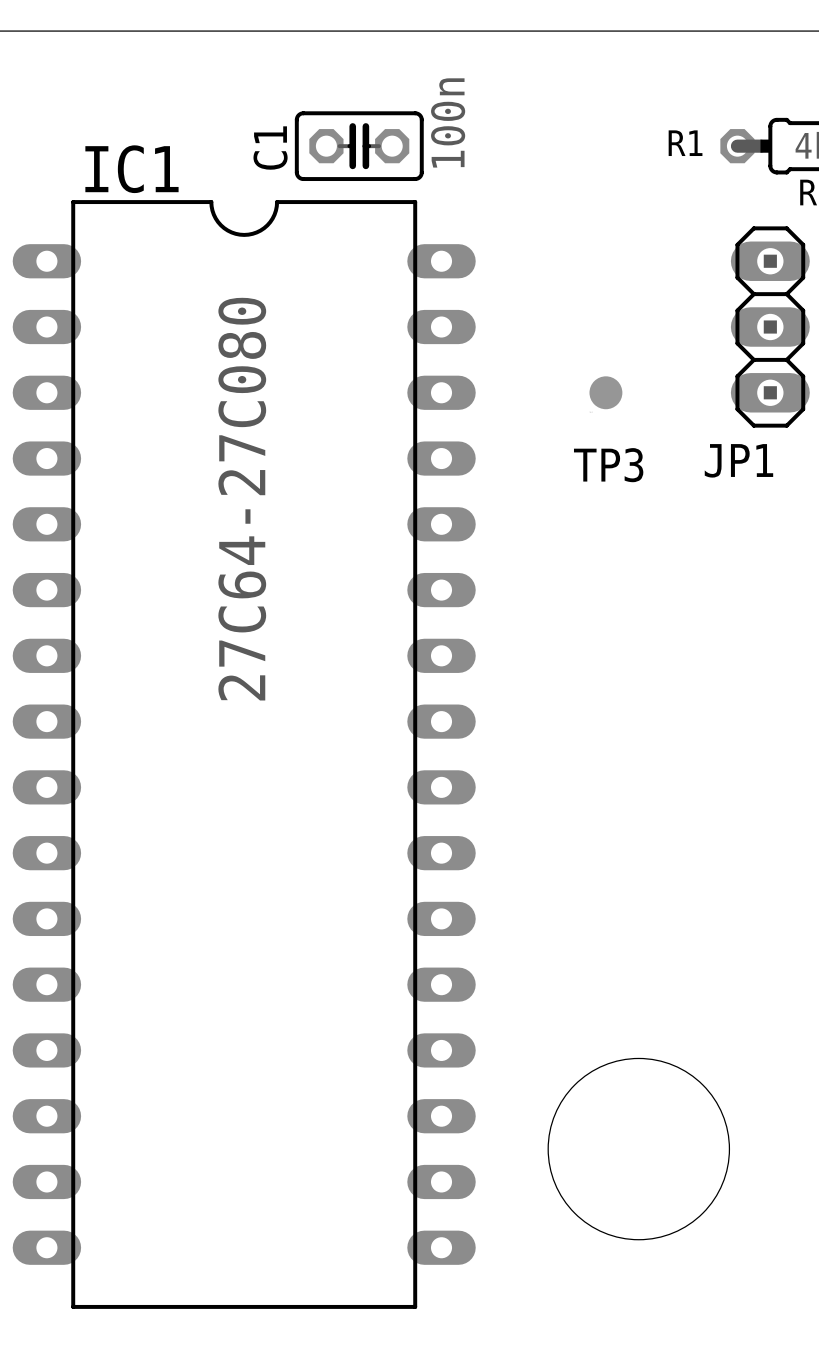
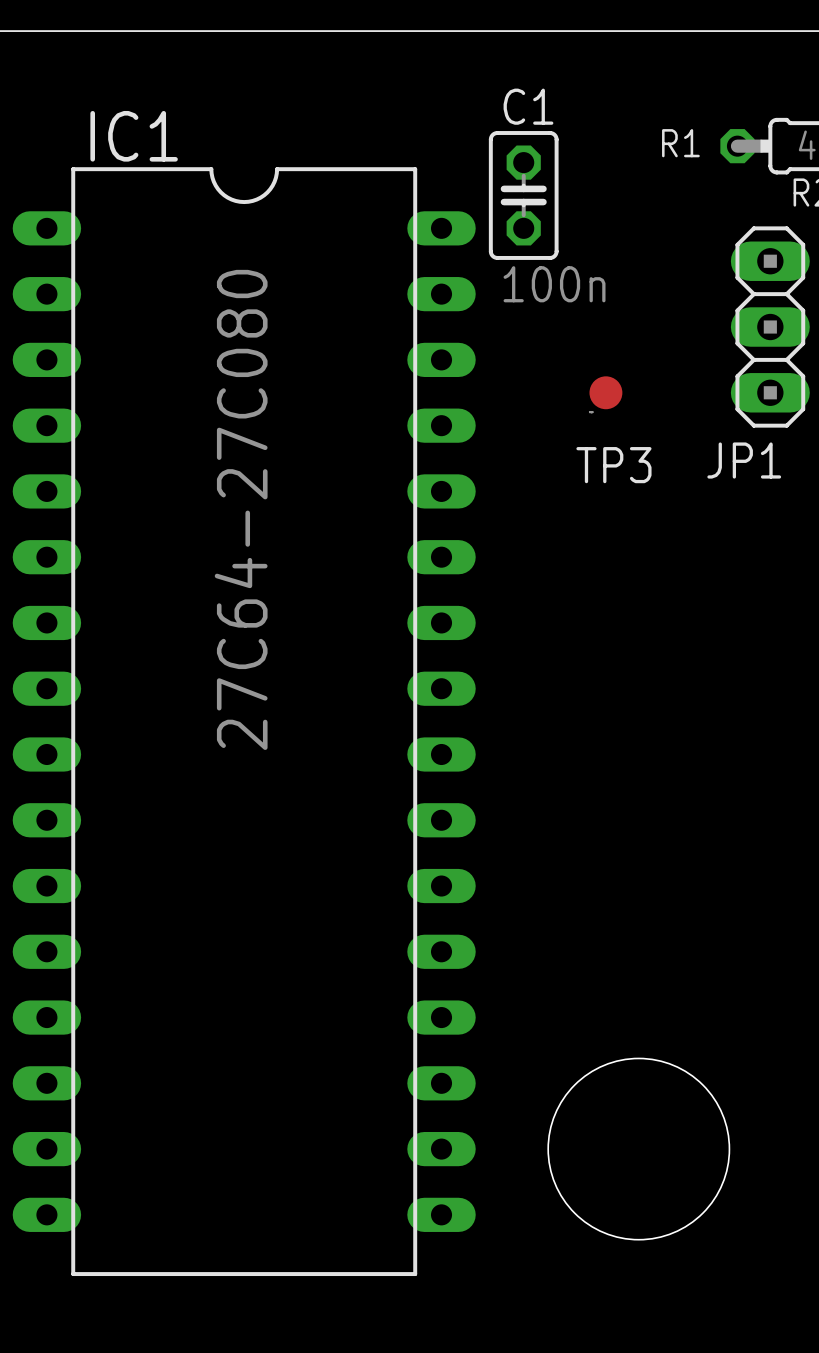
C1 rotation: 0° (359, 146) -> 90° clockwise (523, 195)
C1 position: (359, 146) -> (523, 195)
IC1 position: (244, 754) -> (244, 721)

